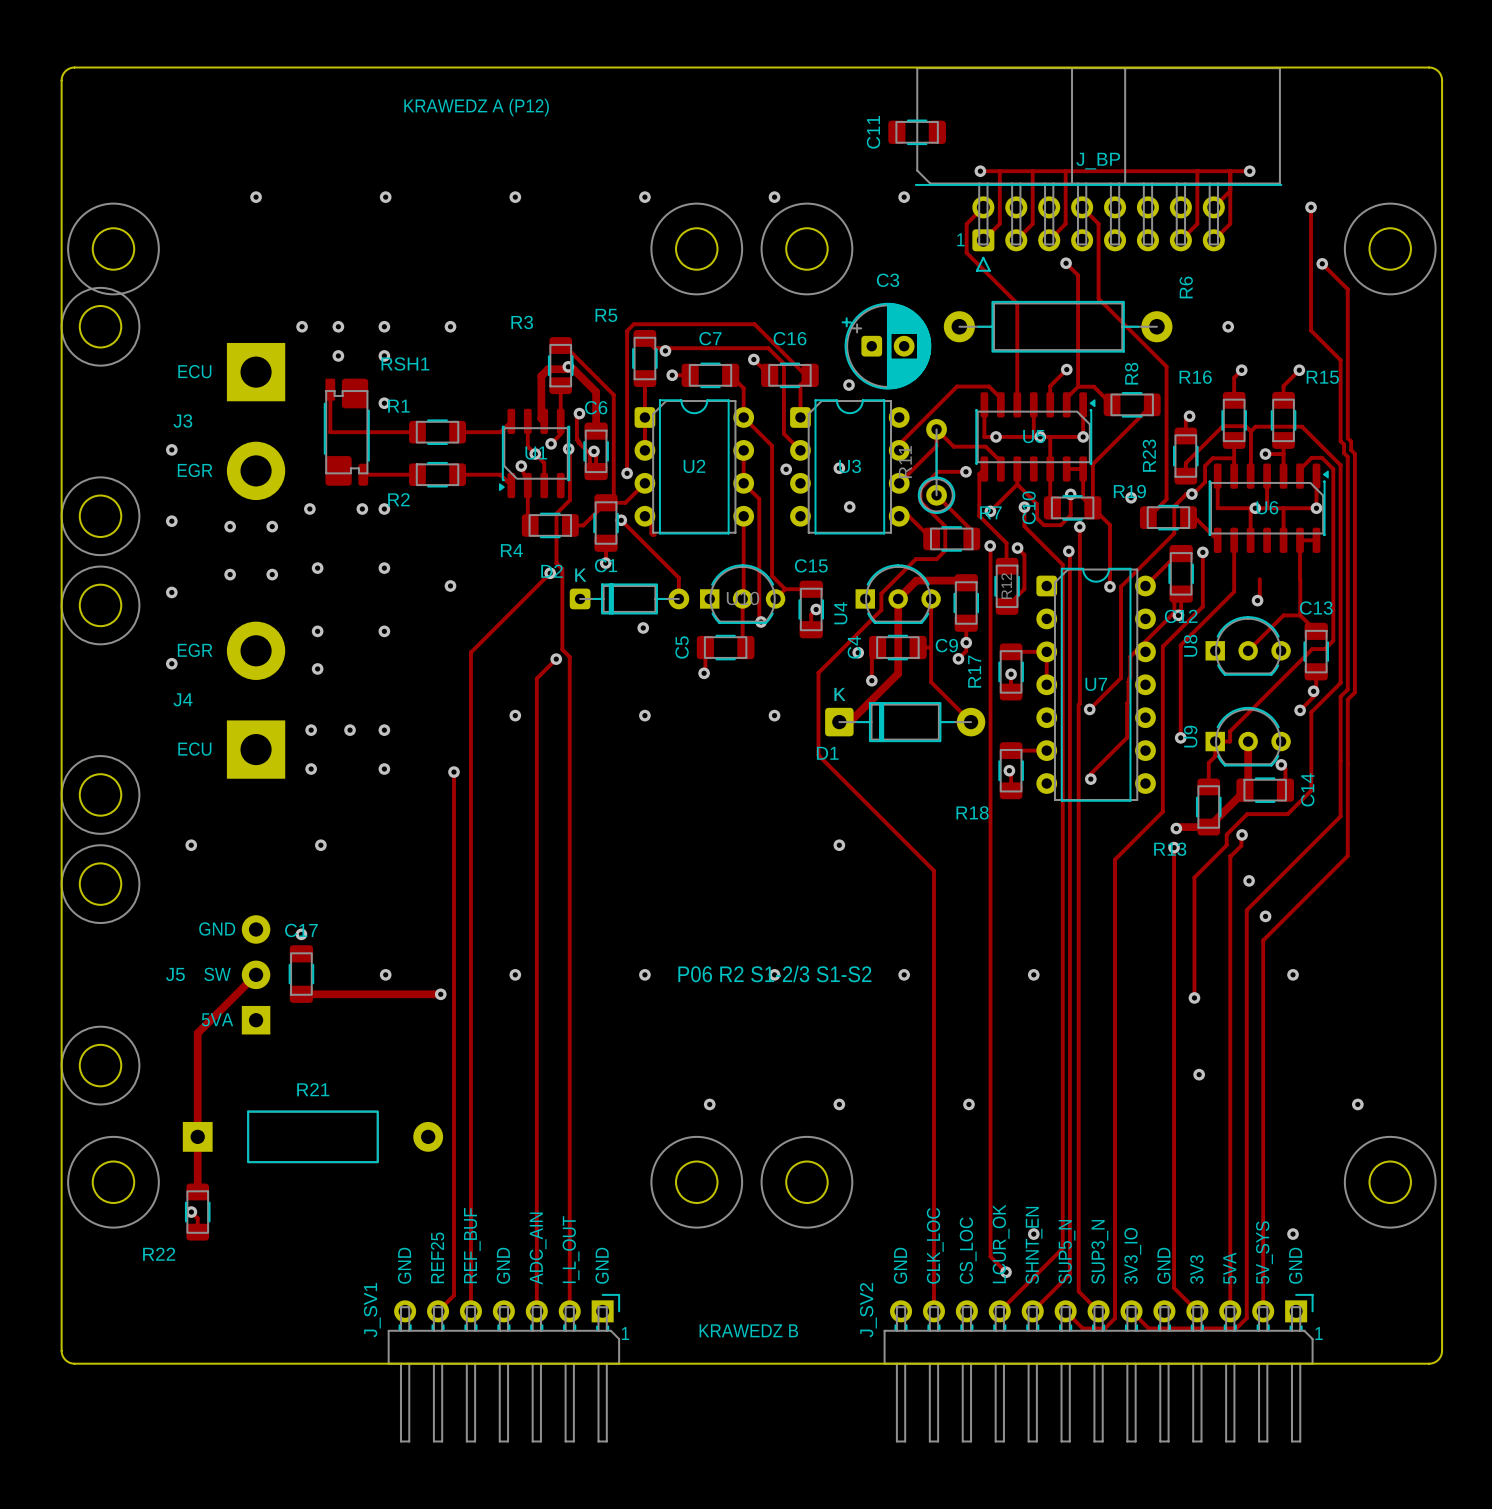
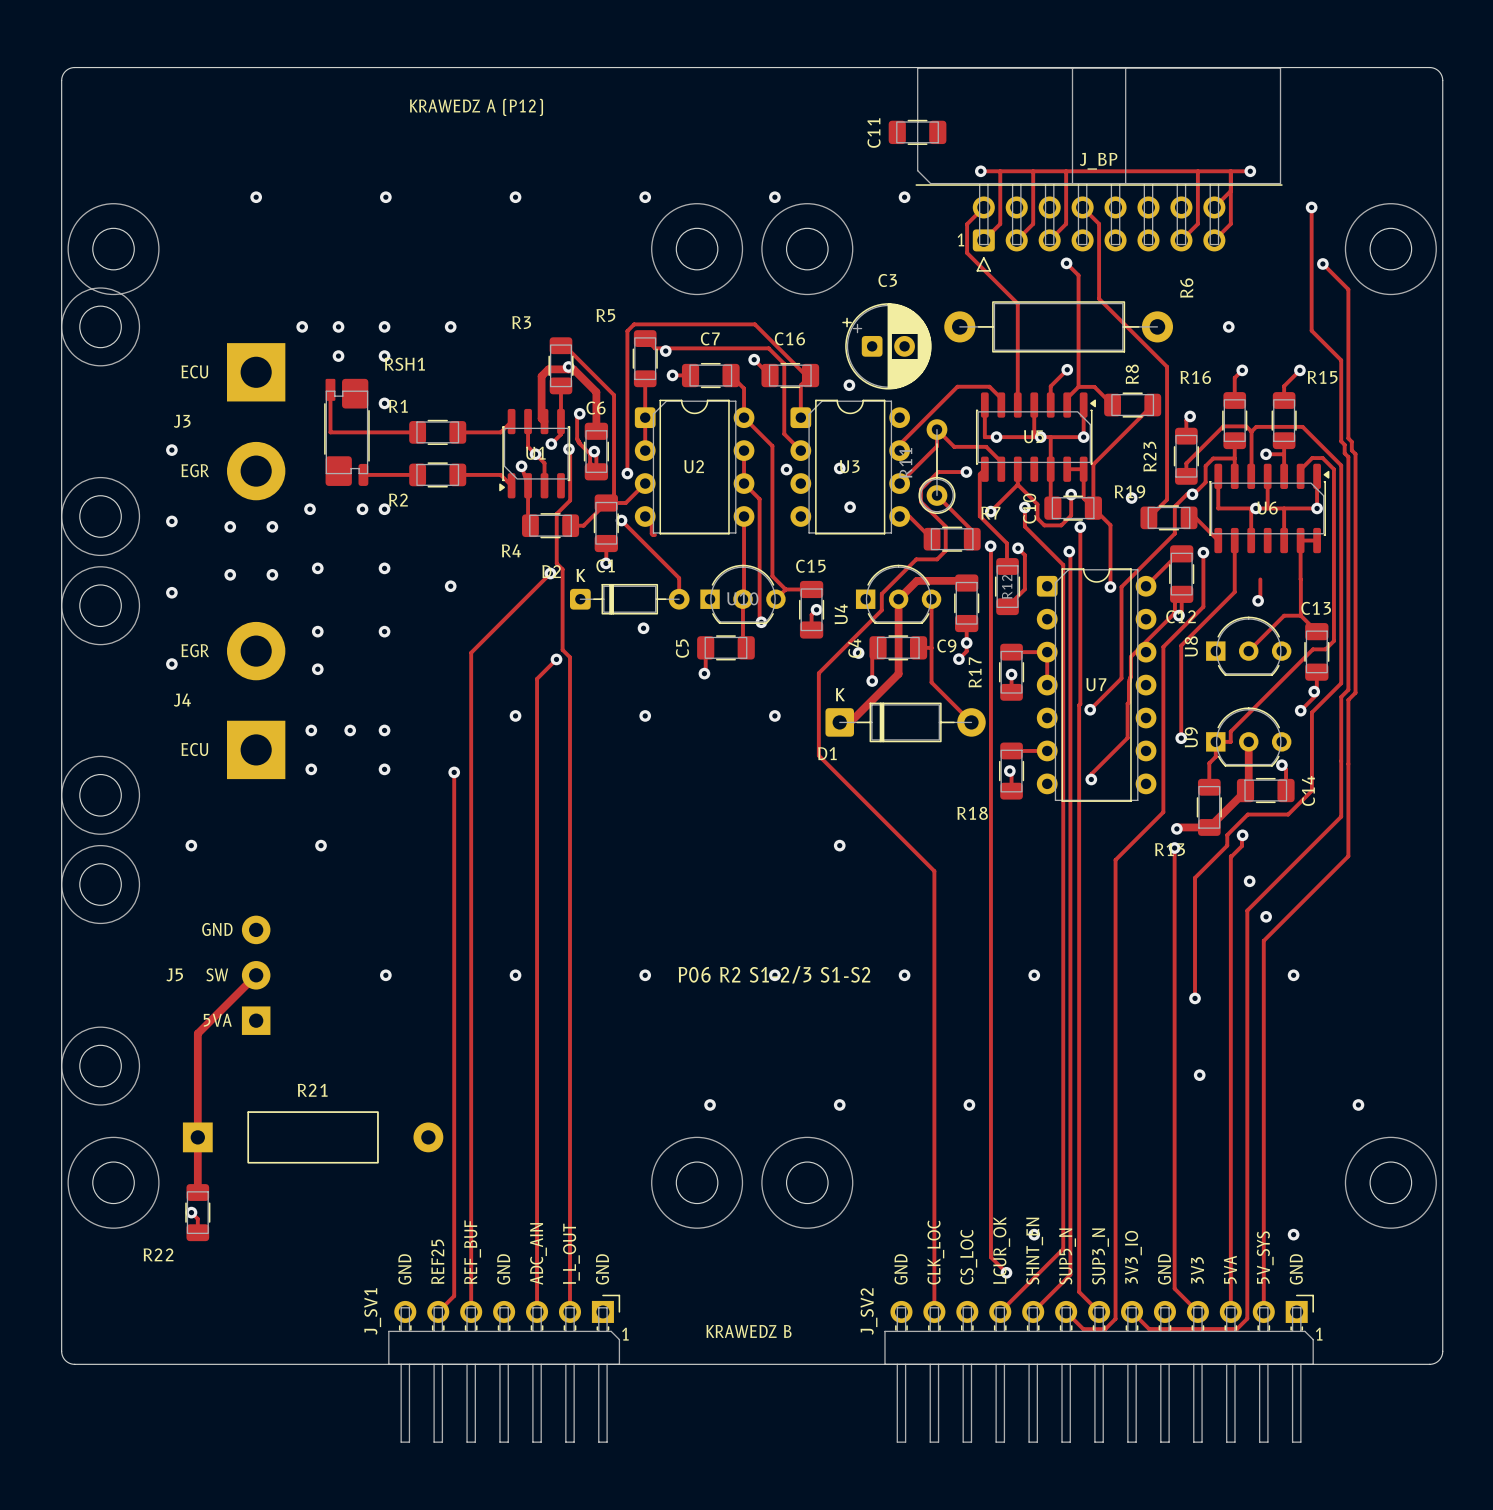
via: (301, 934) -> none
C17: (301, 974) -> none
track: (301, 994) (440, 994) -> none
via: (440, 994) -> none

